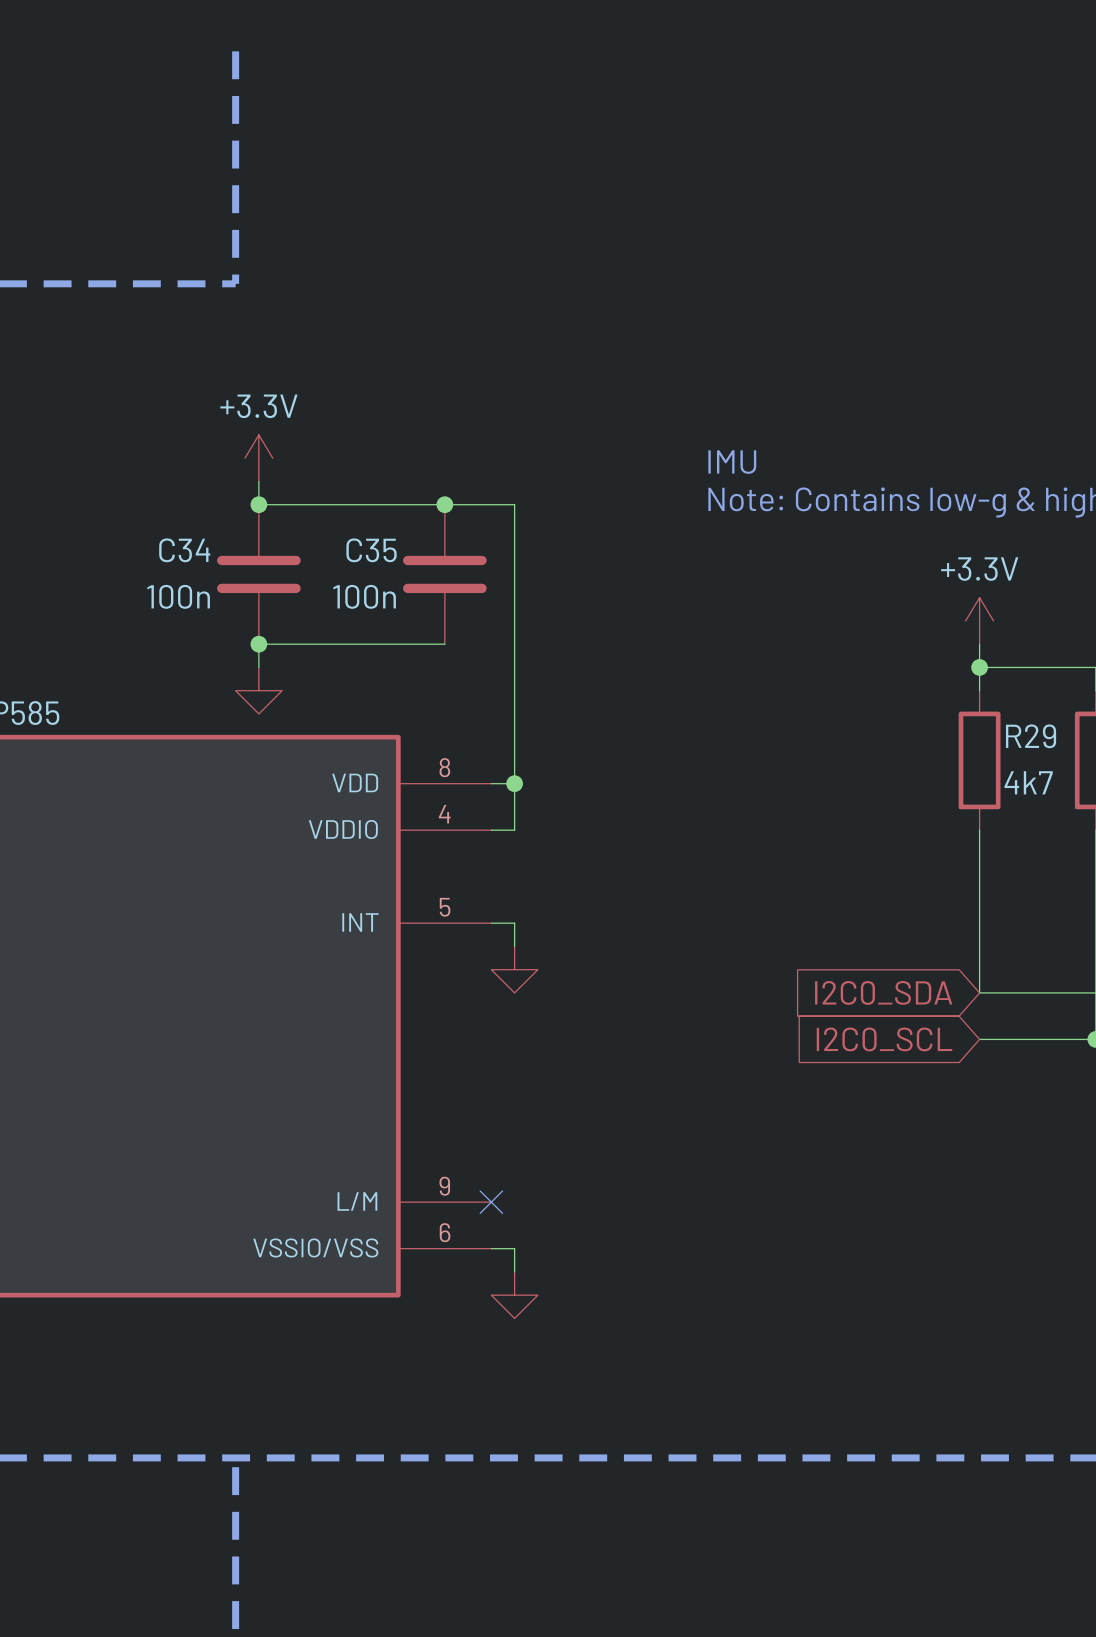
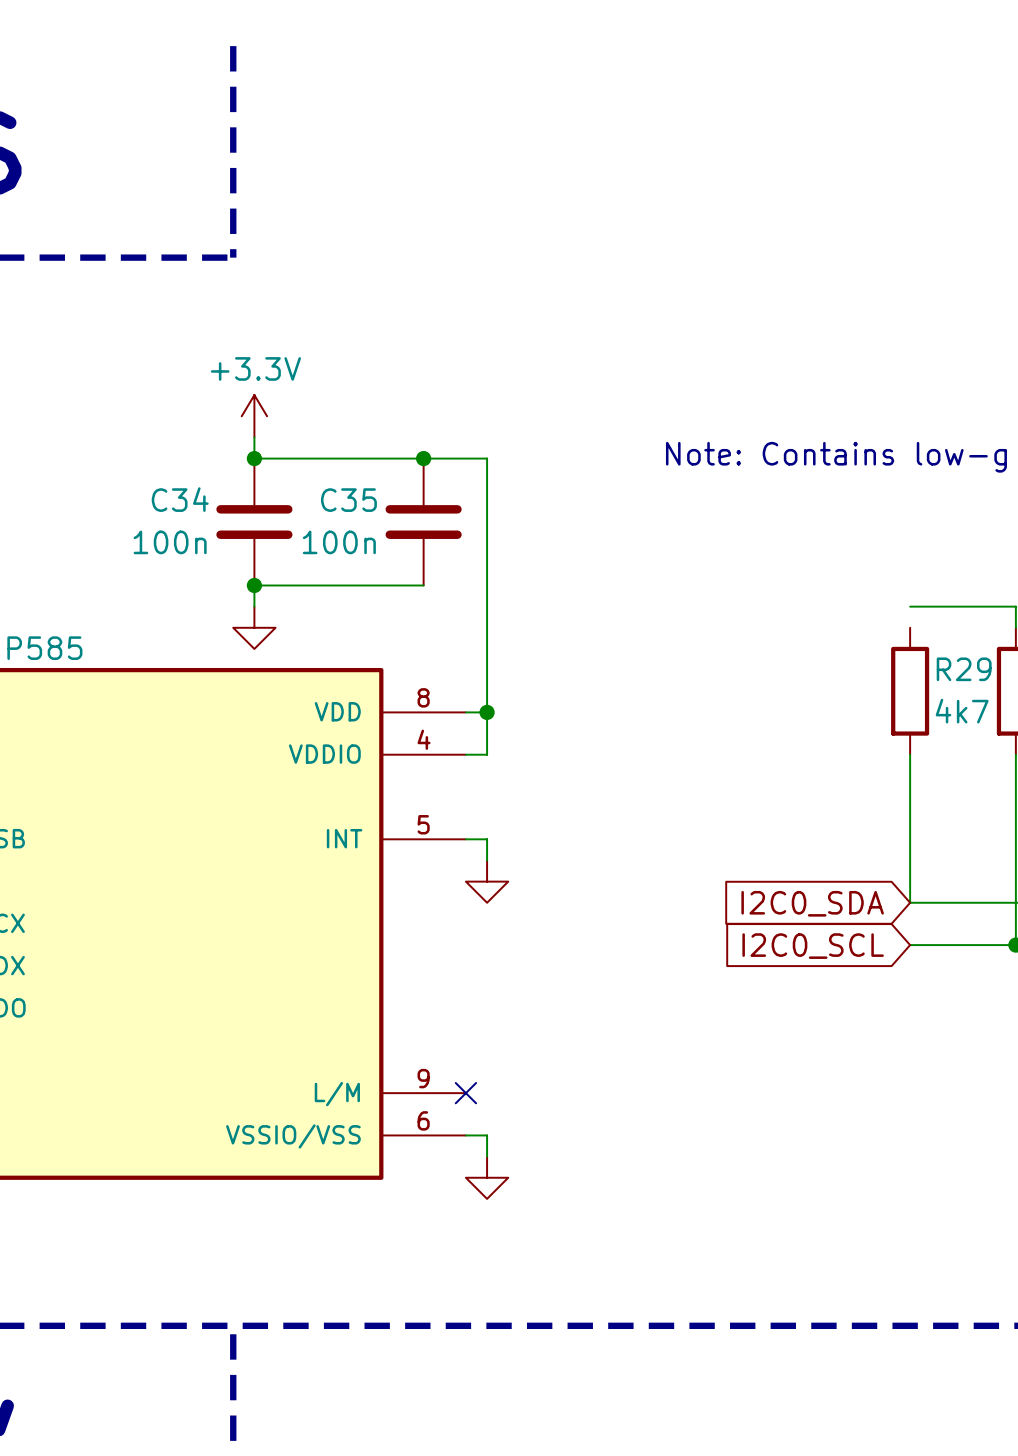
text: IMU (732, 462) -> none
power symbol: +3.3V (979, 620) -> none
wire: (979, 644) (979, 690) -> none
junction: (979, 667) -> none

